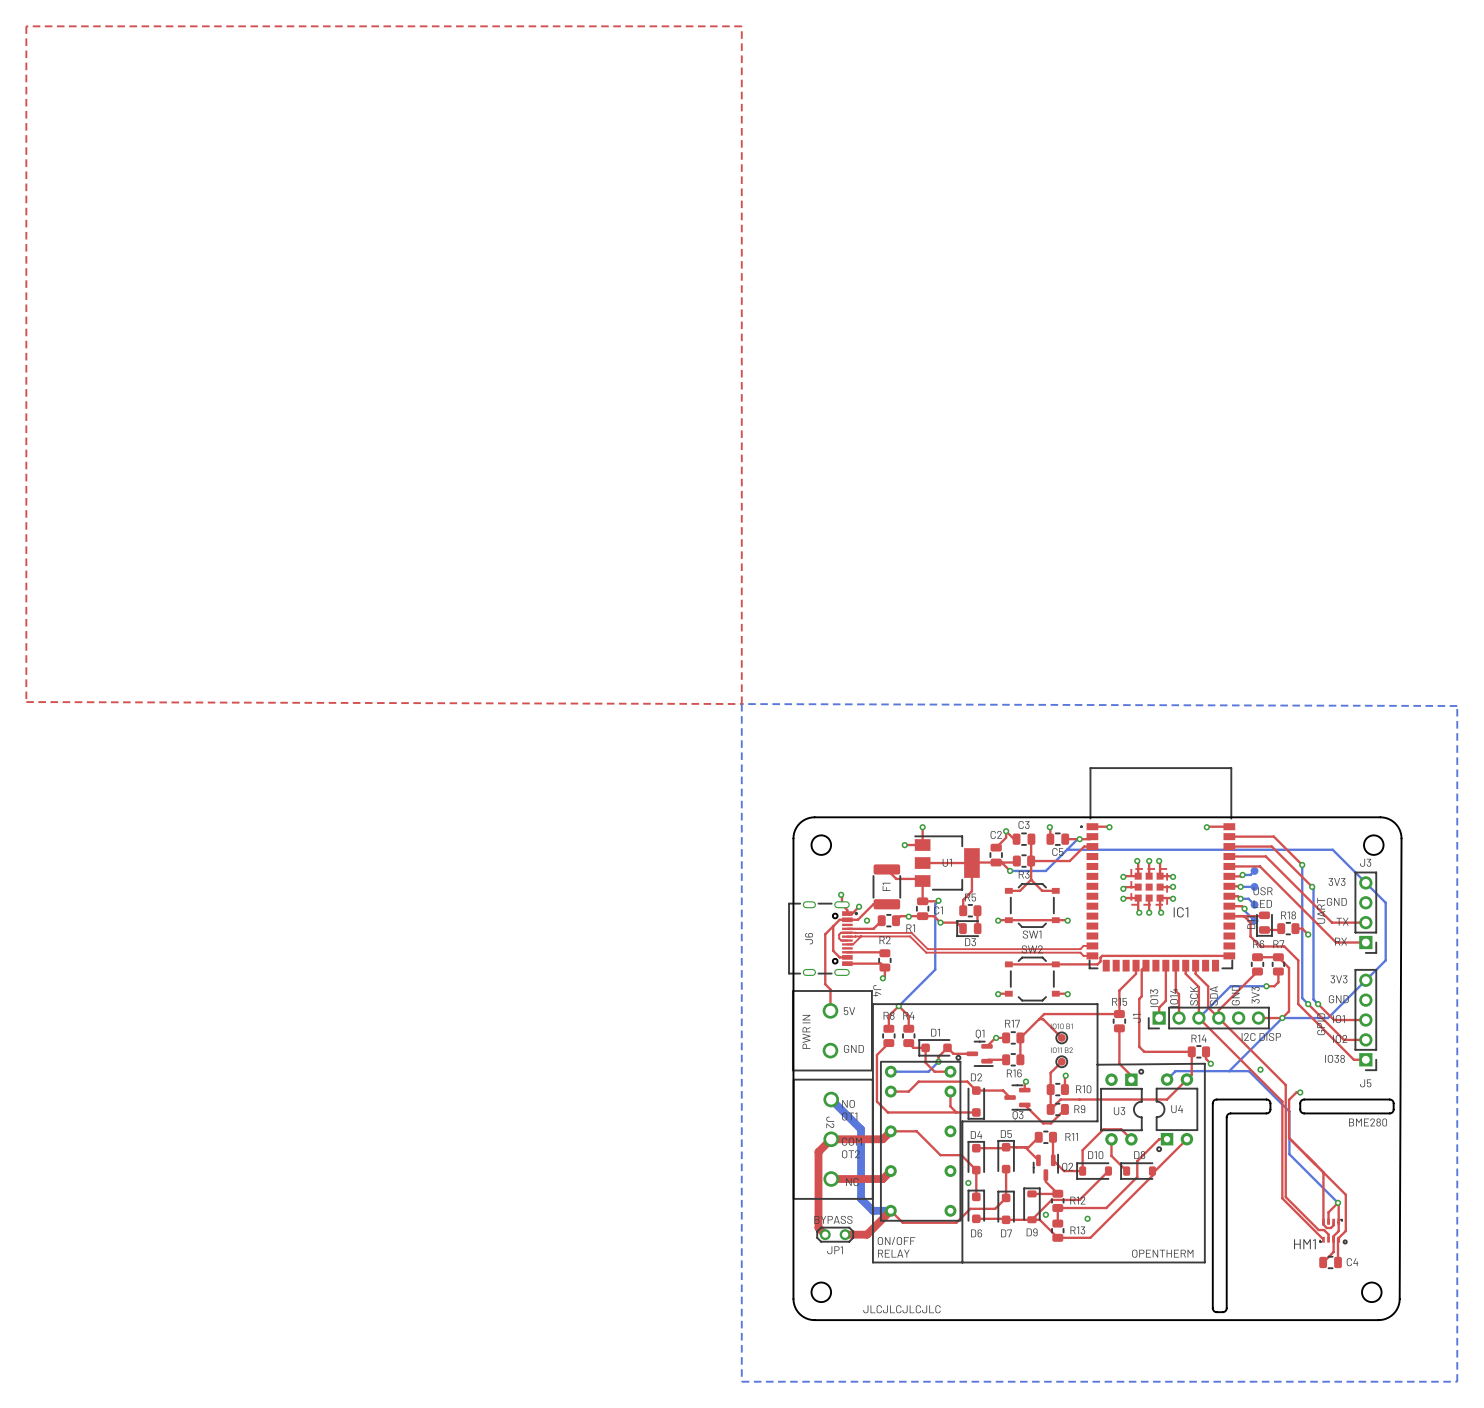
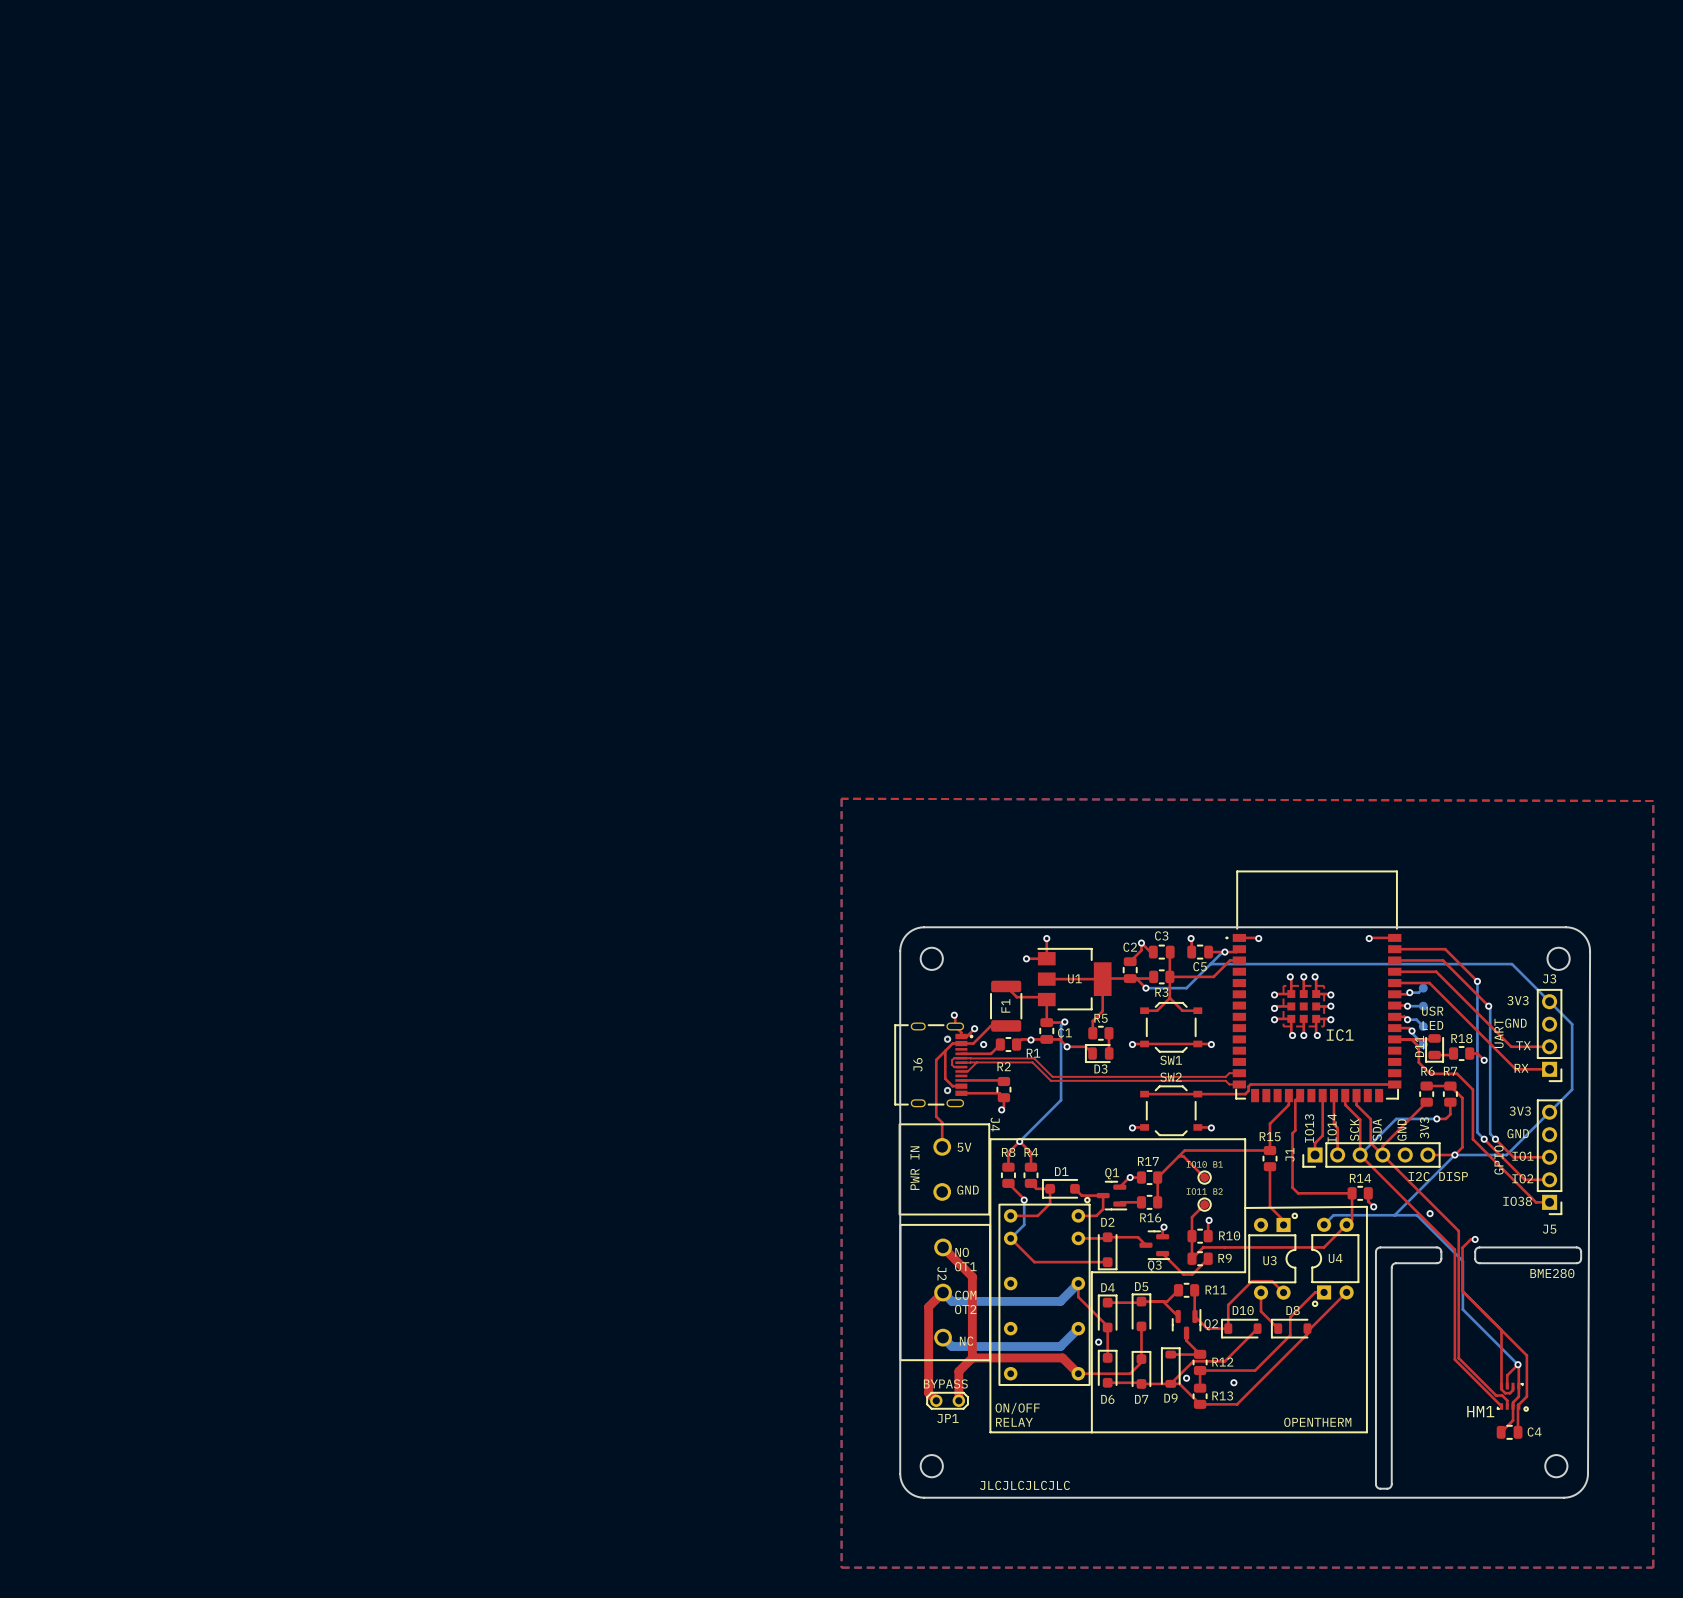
top zone outline: (26, 26) (741, 26) (741, 704) (26, 702) (26, 26) -> none
top zone outline: none -> (841, 798) (841, 1567) (1653, 1567) (1653, 801) (841, 798)
top track: (888, 1043) (876, 1054) (876, 1101) (887, 1112) (911, 1112) -> (1010, 1238) (1034, 1262)
top track: none -> (1008, 1183) (1024, 1200)
top track: (947, 1047) (938, 1056) (938, 1061) -> none
bottom track: none -> (1024, 1200) (1024, 1224) (1010, 1238)
top track: (925, 1060) (934, 1071) (950, 1071) -> (1103, 1195) (1103, 1209) (1096, 1215) (1078, 1215)
top track: none -> (1050, 1203) (1037, 1215) (1010, 1215)
bottom track: (938, 1061) (928, 1071) (890, 1071) -> none
via position: (938, 1061) -> (1024, 1200)
top track: (976, 1090) (967, 1081) (918, 1081) (908, 1091) (890, 1091) -> none
top track: (950, 1091) (950, 1106) (956, 1112) -> (1078, 1238) (1107, 1237)
top track: none -> (943, 1247) (972, 1276) (972, 1357)
bottom track: (831, 1099) (861, 1129) (861, 1198) (872, 1210) (890, 1210) -> none
bottom track: none -> (1078, 1283) (1060, 1301) (951, 1301) (943, 1292)
top track: (831, 1139) (882, 1139) (890, 1131) (916, 1131) (940, 1155) (961, 1155) (976, 1170) -> (1078, 1283) (1078, 1297) (1107, 1327)
top track: (890, 1171) (882, 1179) (831, 1179) -> none
bottom track: none -> (1078, 1328) (1060, 1346) (951, 1346) (943, 1337)
top track: none -> (972, 1357) (958, 1371) (958, 1400)
top track: (1006, 1197) (995, 1208) (970, 1208) (956, 1222) (902, 1222) (890, 1210) (866, 1234) (845, 1234) -> (1141, 1359) (1141, 1362) (1130, 1373) (1078, 1373) (1062, 1357) (972, 1357)

